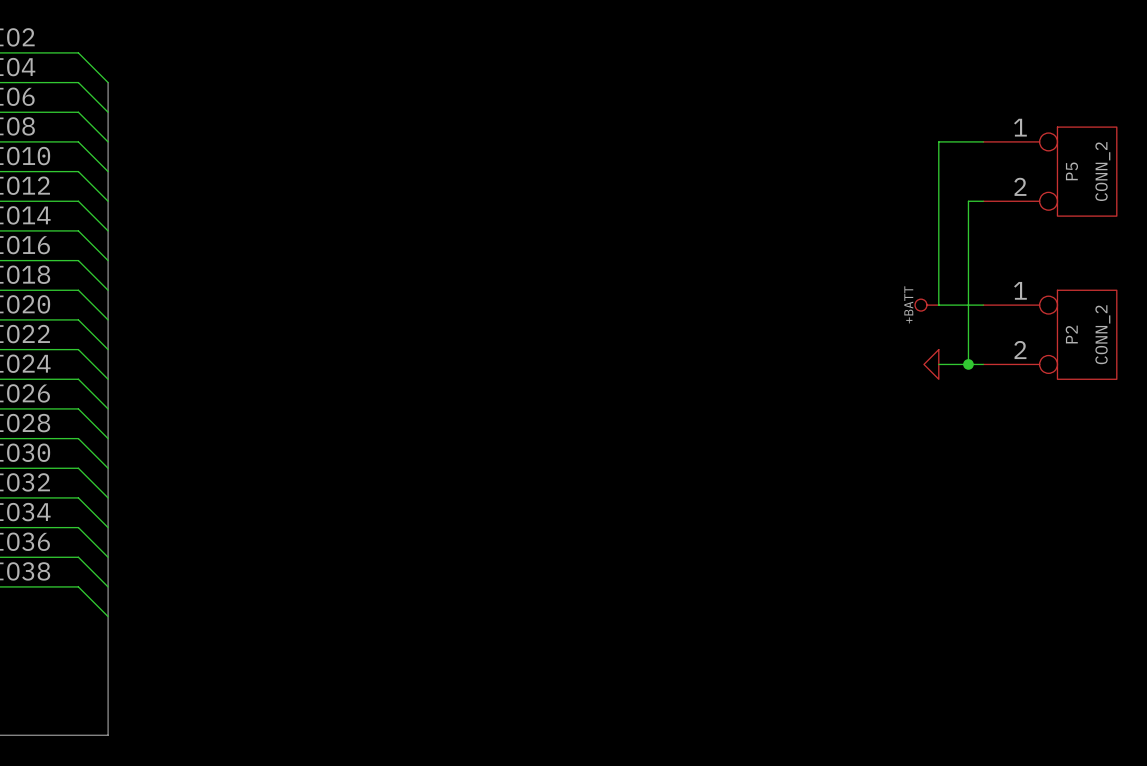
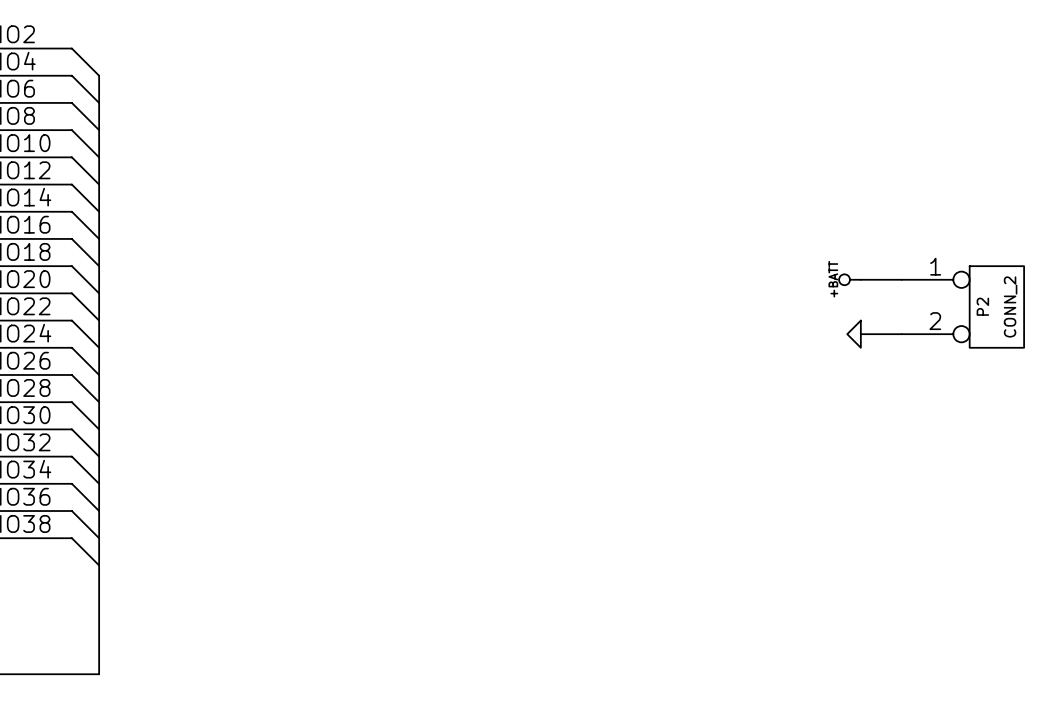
wire: (983, 141) (938, 141) (938, 305) -> none
P5: CONN_2 (1050, 171) -> none
wire: (983, 201) (968, 201) (968, 364) -> none
junction: (968, 364) -> none

